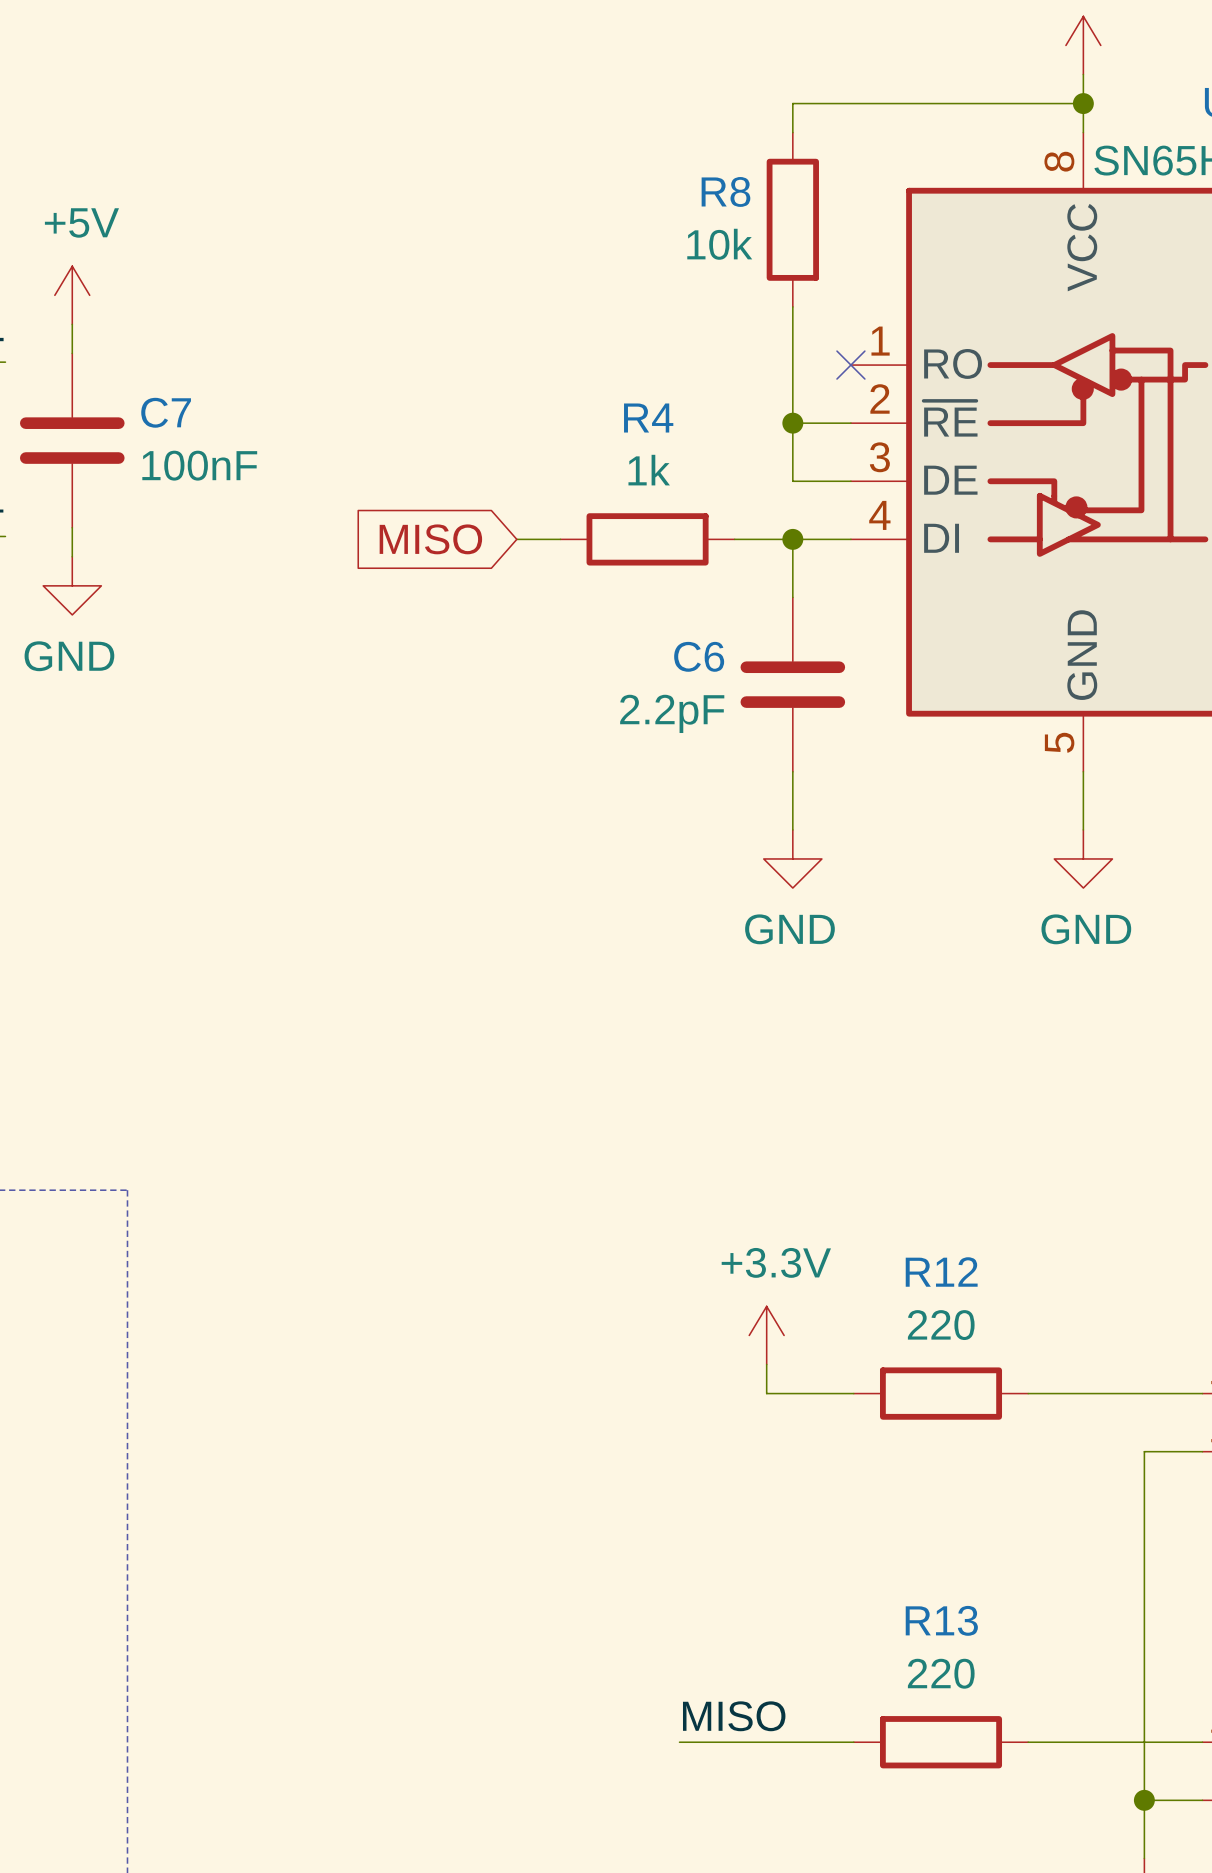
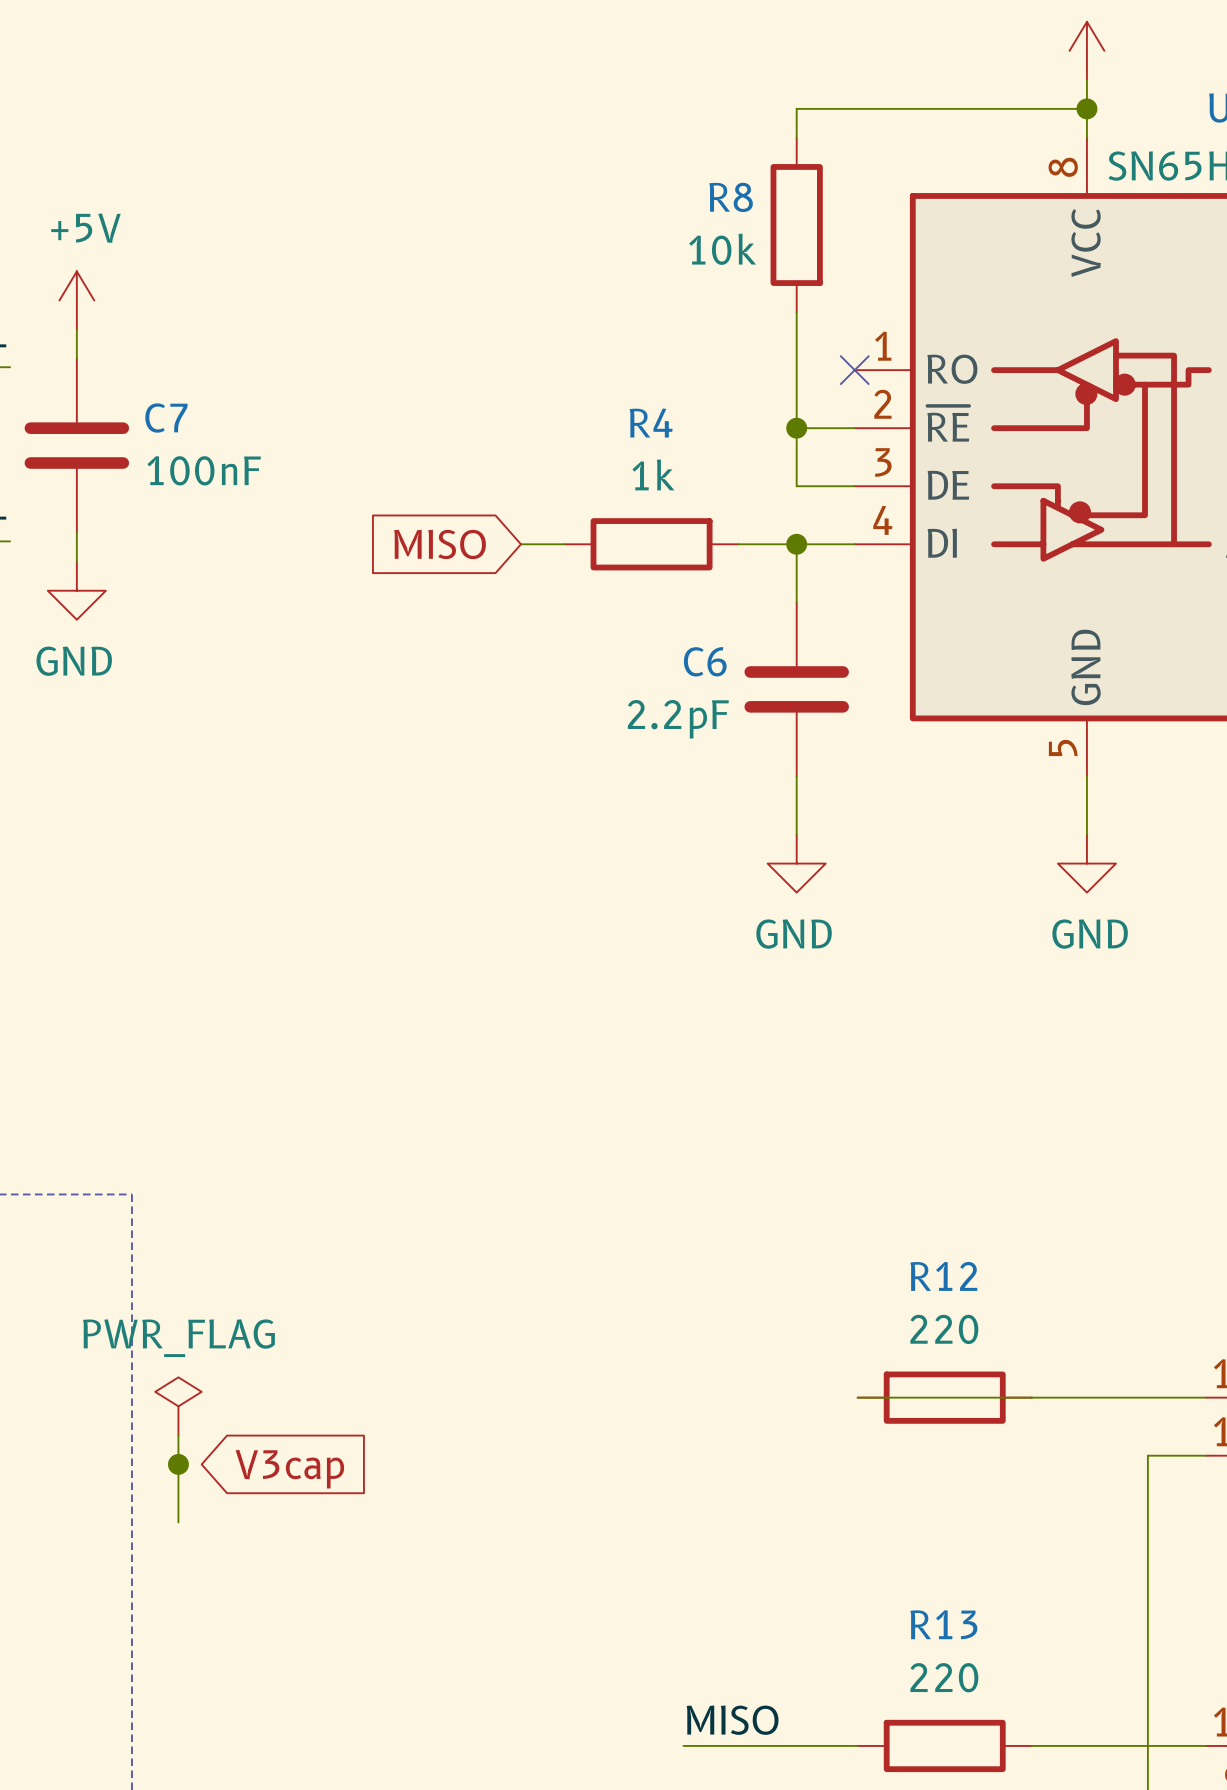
power symbol: +3.3V (766, 1335) -> none
wire: (766, 1364) (766, 1393) (853, 1393) -> (1031, 1397) (857, 1397)
power symbol: none -> PWR_FLAG (178, 1406)
wire: none -> (178, 1435) (178, 1522)
junction: none -> (178, 1464)
global label: none -> V3cap (289, 1469)

